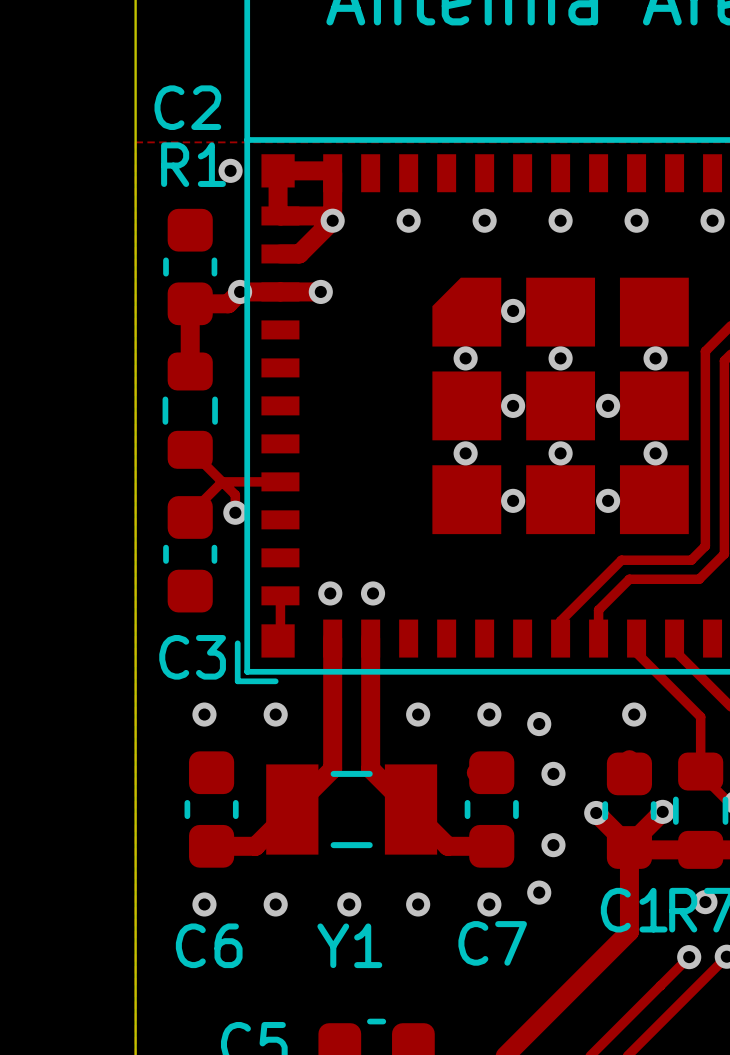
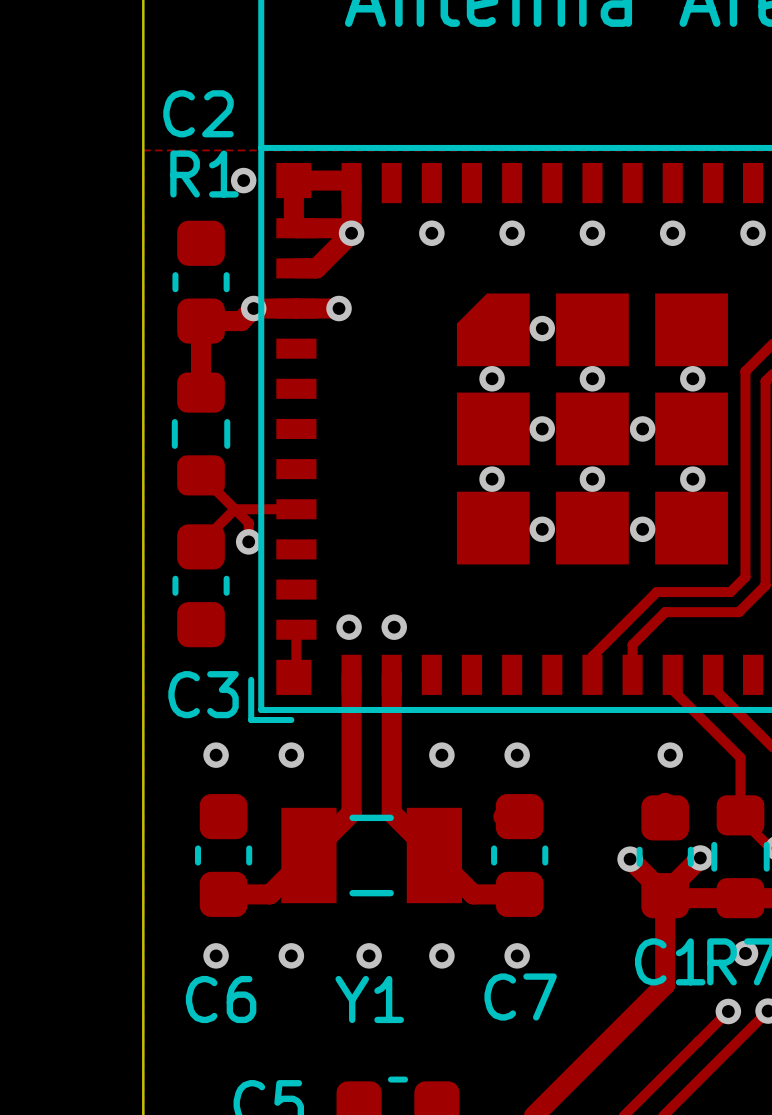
via: (539, 724) -> none
via: (553, 773) -> none
via: (553, 845) -> none
via: (539, 892) -> none

